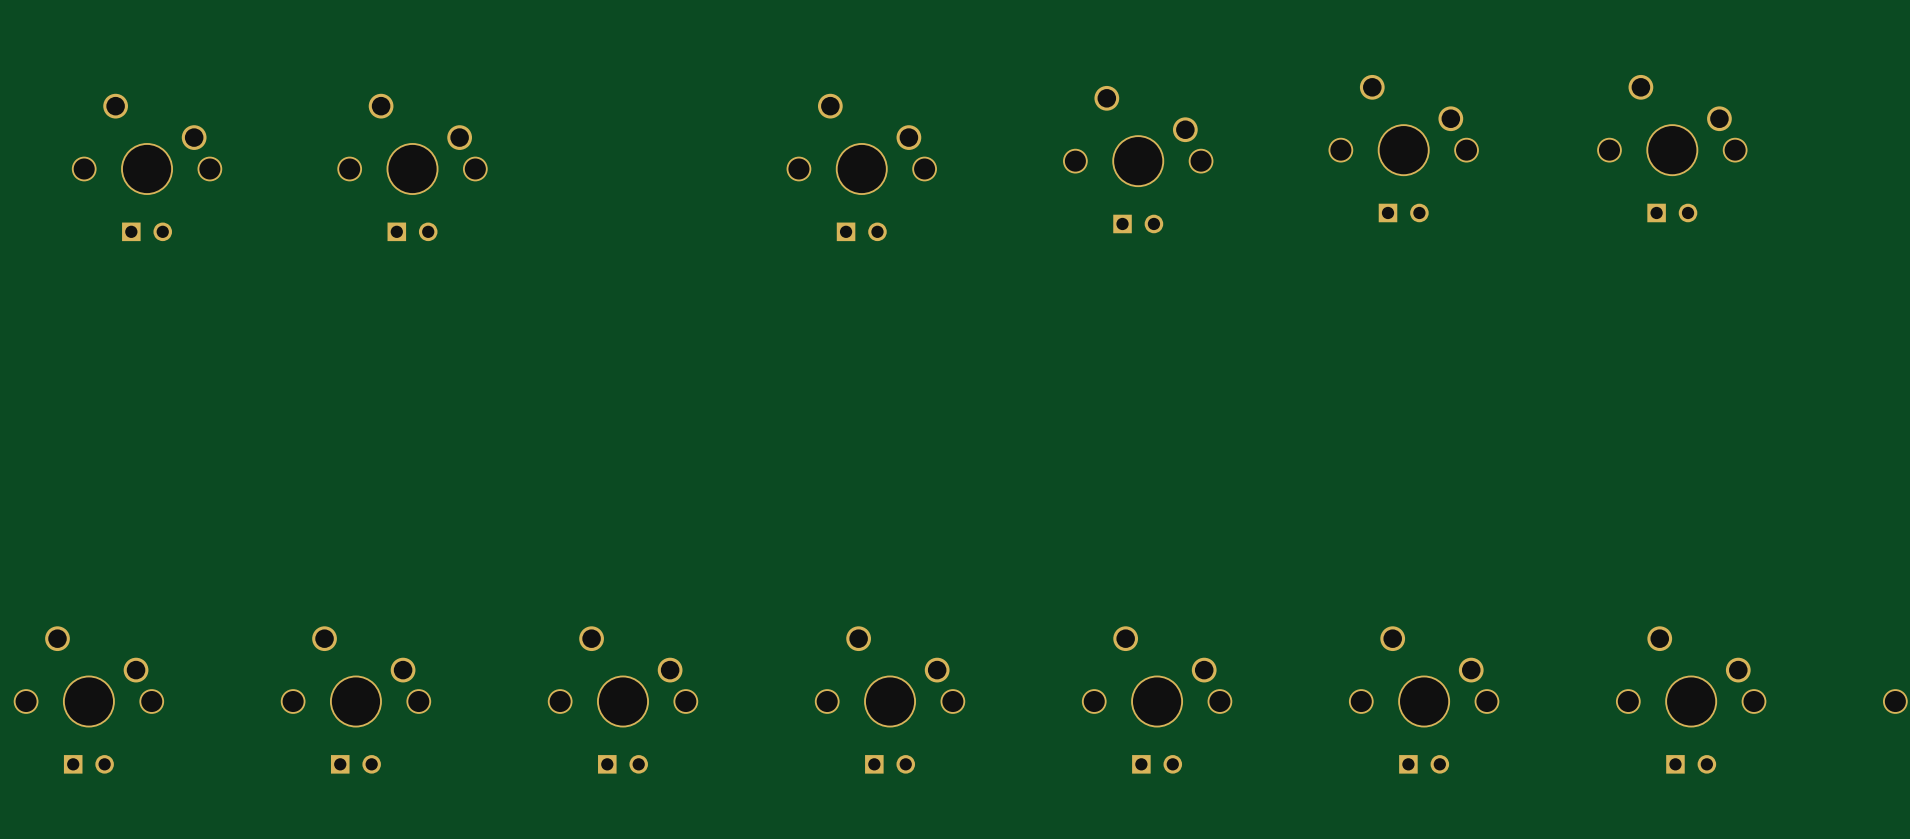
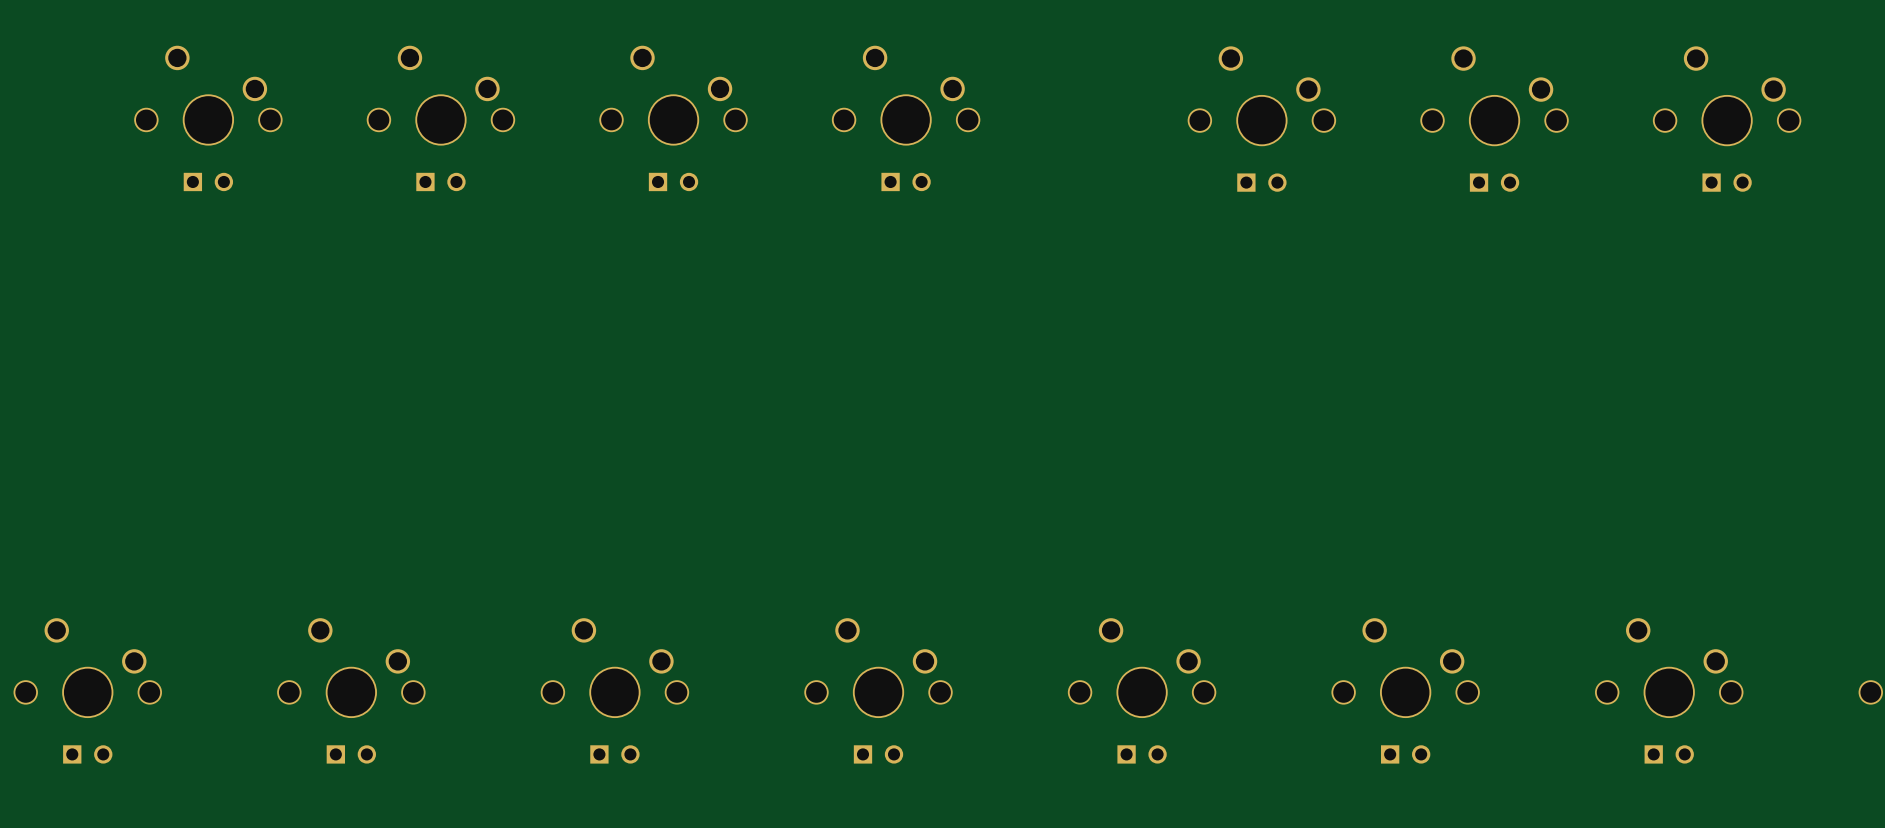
part: none -> (673, 118)
part: none -> (1261, 119)
part: none -> (1494, 119)
part: none -> (1727, 119)
part: (1403, 148) -> none
part: (1672, 148) -> none
part: (1138, 159) -> none
part position: (147, 167) -> (208, 118)
part position: (412, 167) -> (440, 118)
part position: (861, 167) -> (906, 118)

